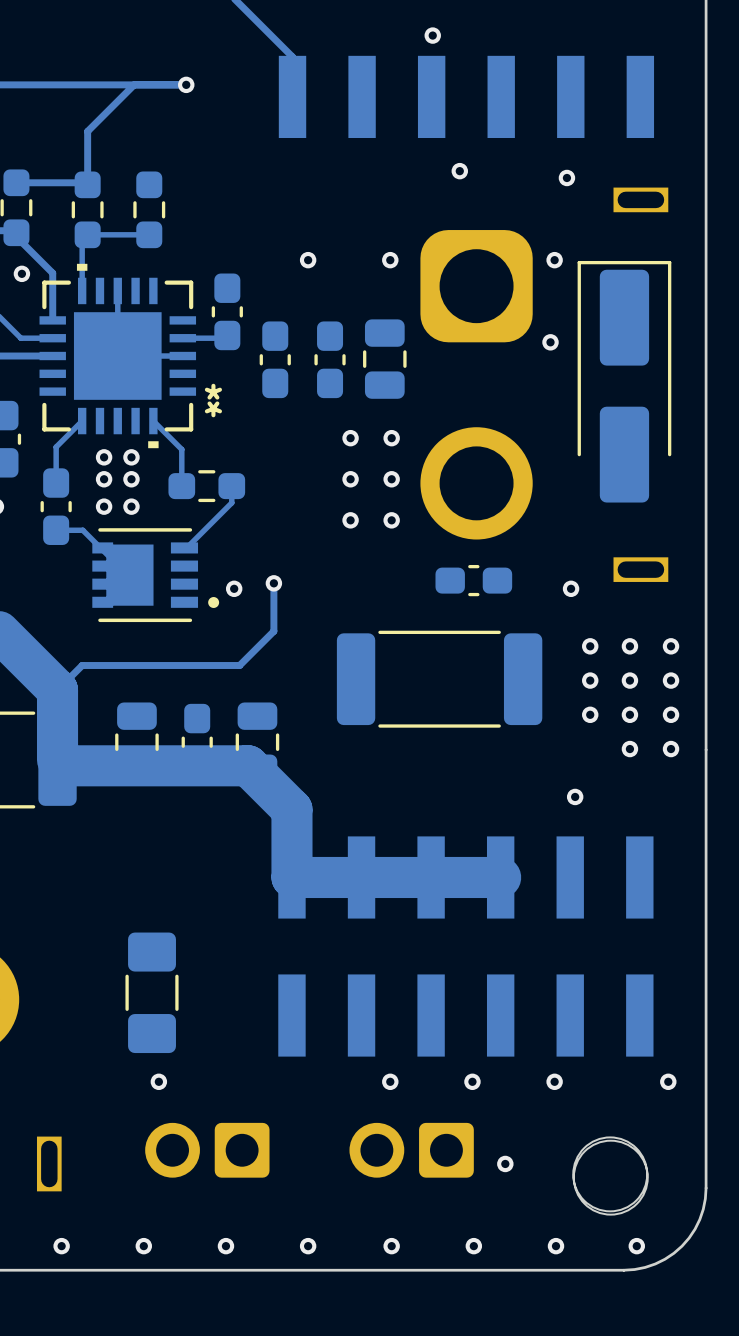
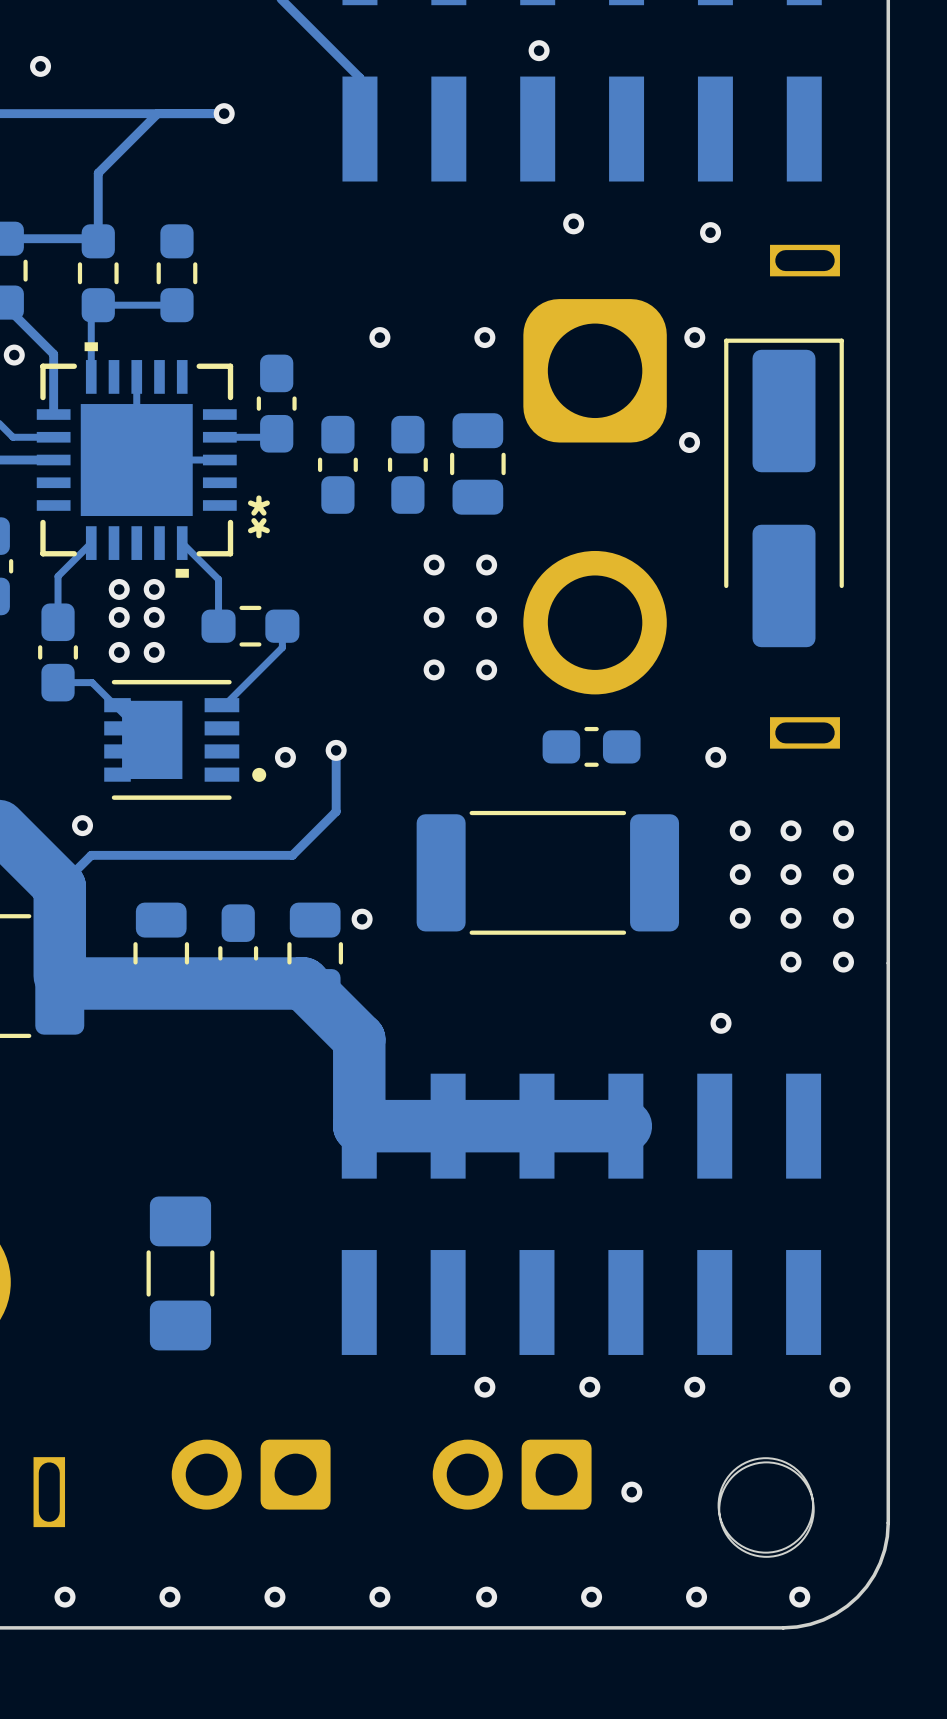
via: none -> (40, 66)
via: none -> (82, 825)
via: none -> (362, 919)
via: (158, 1081) -> none

